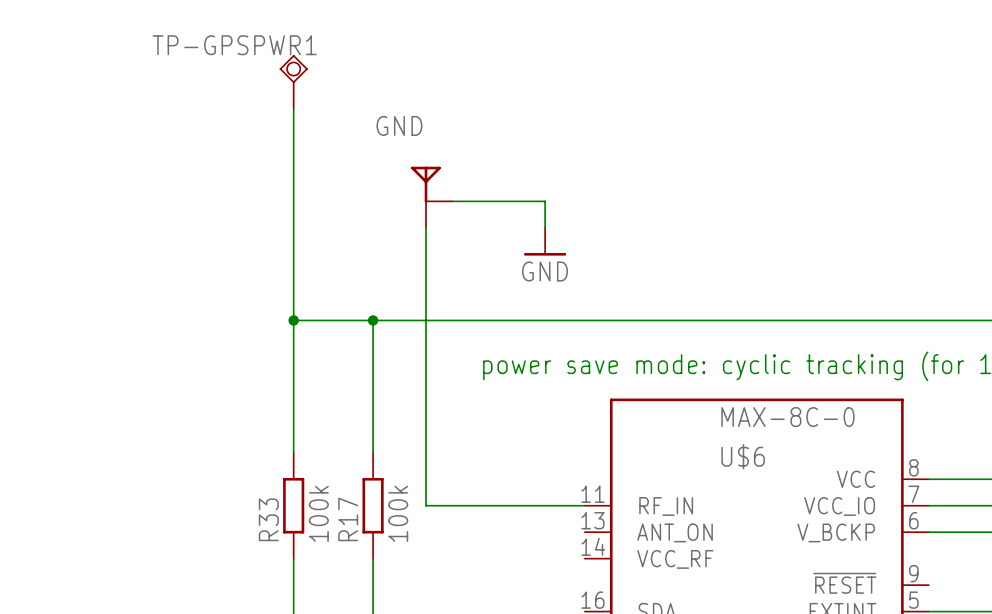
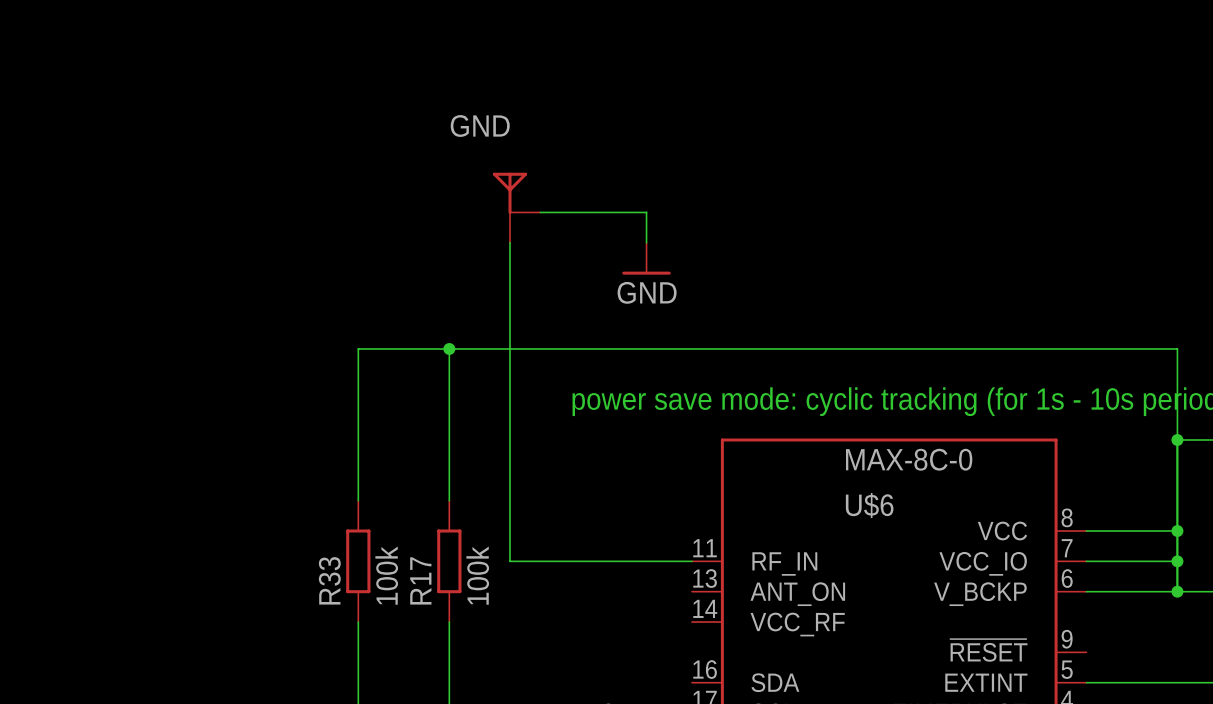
TP-GPSPWR1: (293, 81) -> none
wire: (293, 108) (293, 320) -> none
junction: (293, 320) -> none

